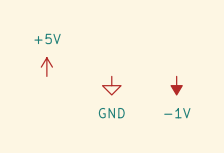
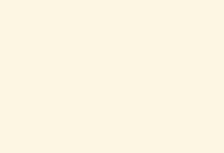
power symbol: +5V (46, 67) -> none
power symbol: GND (111, 85) -> none
power symbol: -1V (176, 85) -> none

